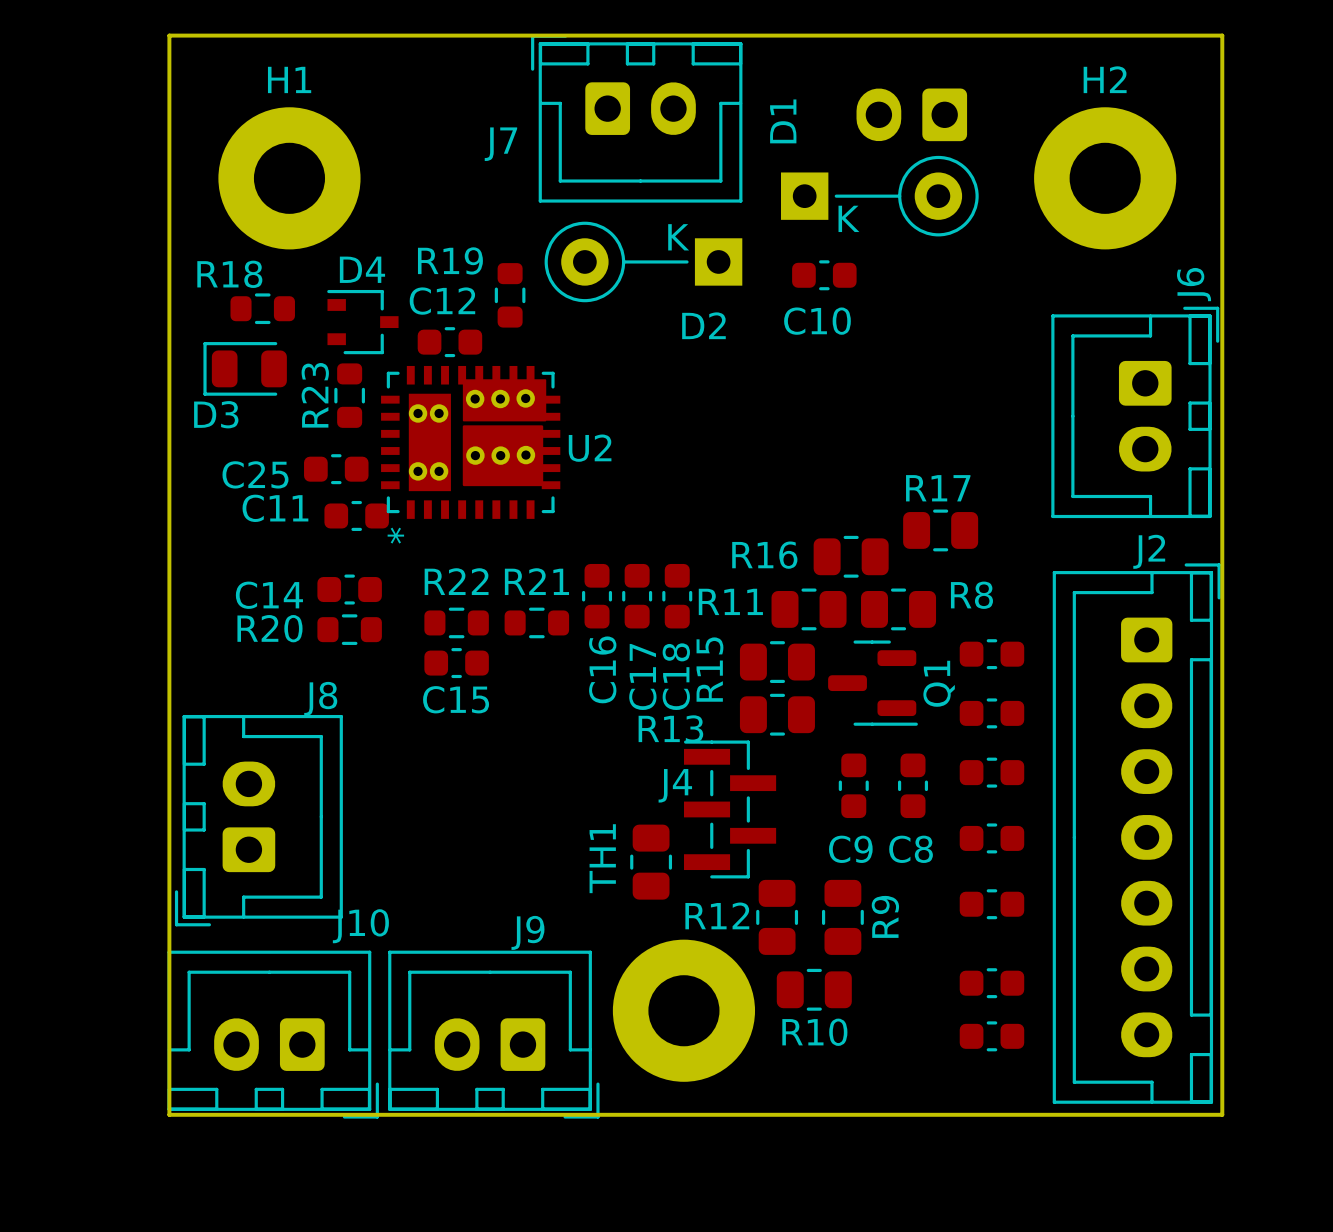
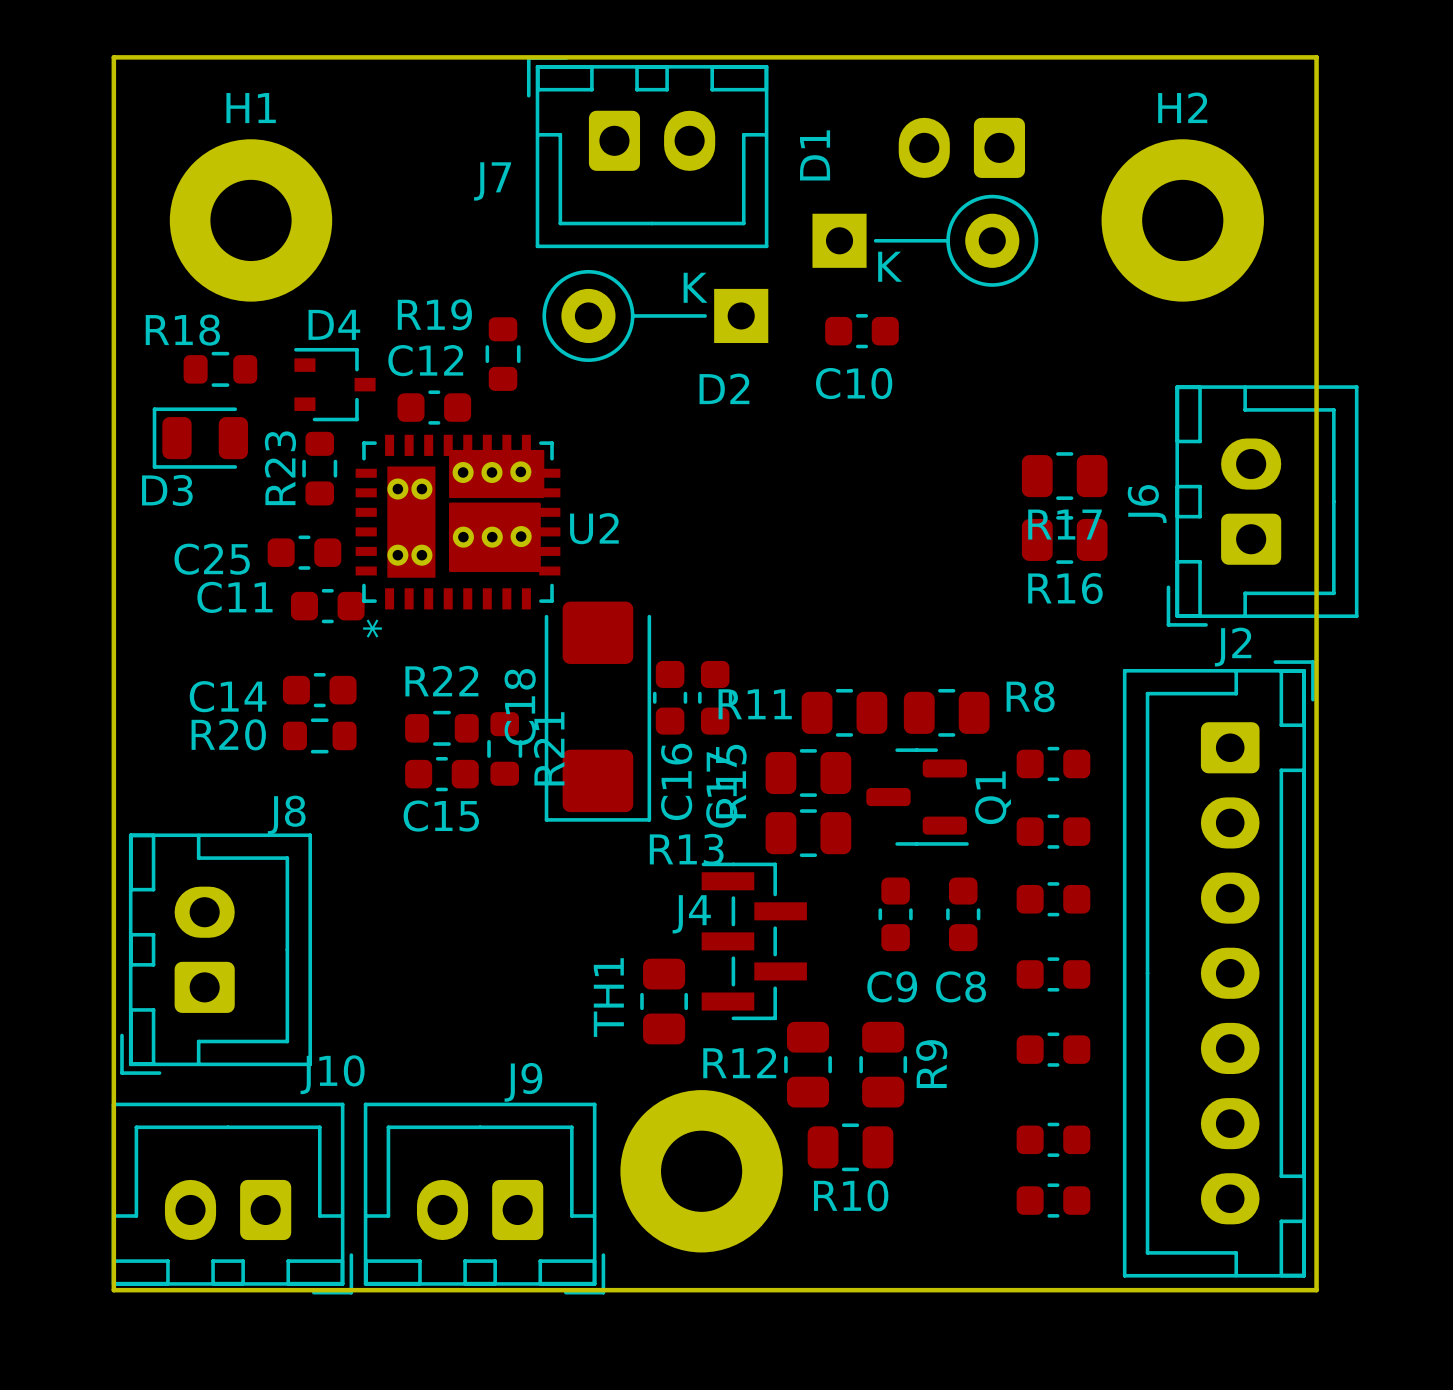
J6 name position: J6 (1194, 284) -> J6 (1147, 504)
J6 rotation: 0° (1135, 412) -> 180° (1262, 505)
R17 name position: R17 (938, 488) -> R17 (1065, 524)
R17 position: (940, 530) -> (1064, 476)
R16 name position: R16 (764, 555) -> R16 (1065, 588)
R16 position: (851, 556) -> (1064, 539)
C18 footprint: [662, 563, 693, 629] -> [544, 601, 652, 822]
C16 position: (597, 596) -> (670, 697)
C17 position: (637, 596) -> (715, 697)
R21 rotation: 0° (536, 622) -> 90° clockwise (504, 748)
C18 name position: C18 (676, 676) -> C18 (520, 707)

